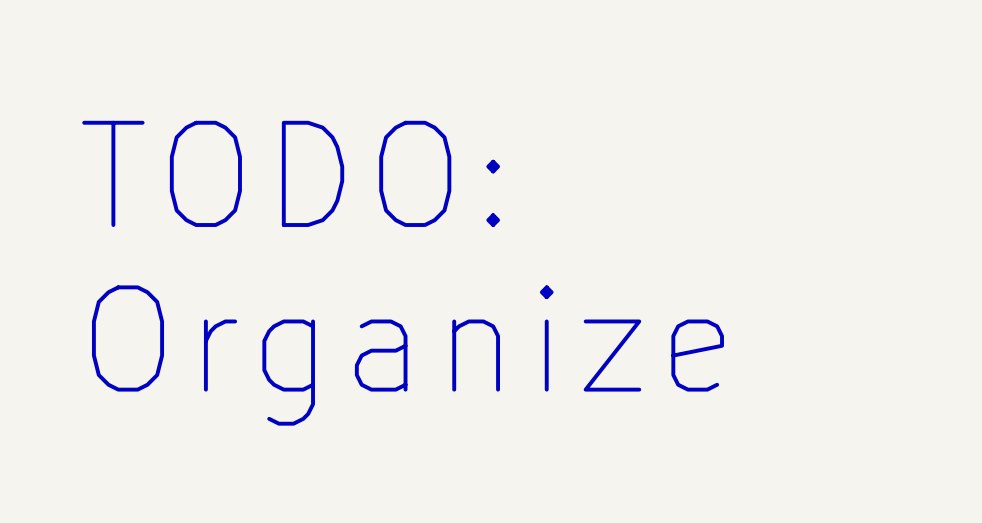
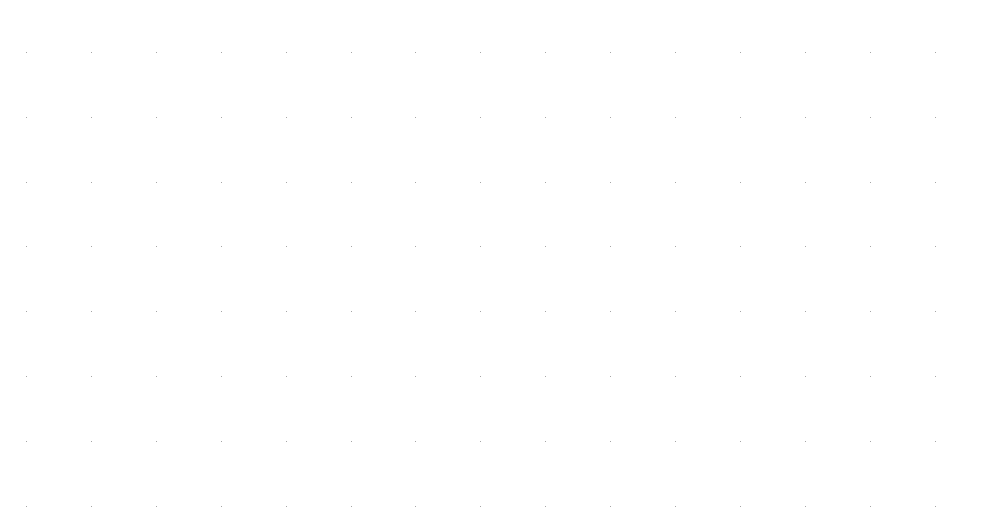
text: TODO: (291, 173) -> none
text: Organize (407, 355) -> none

